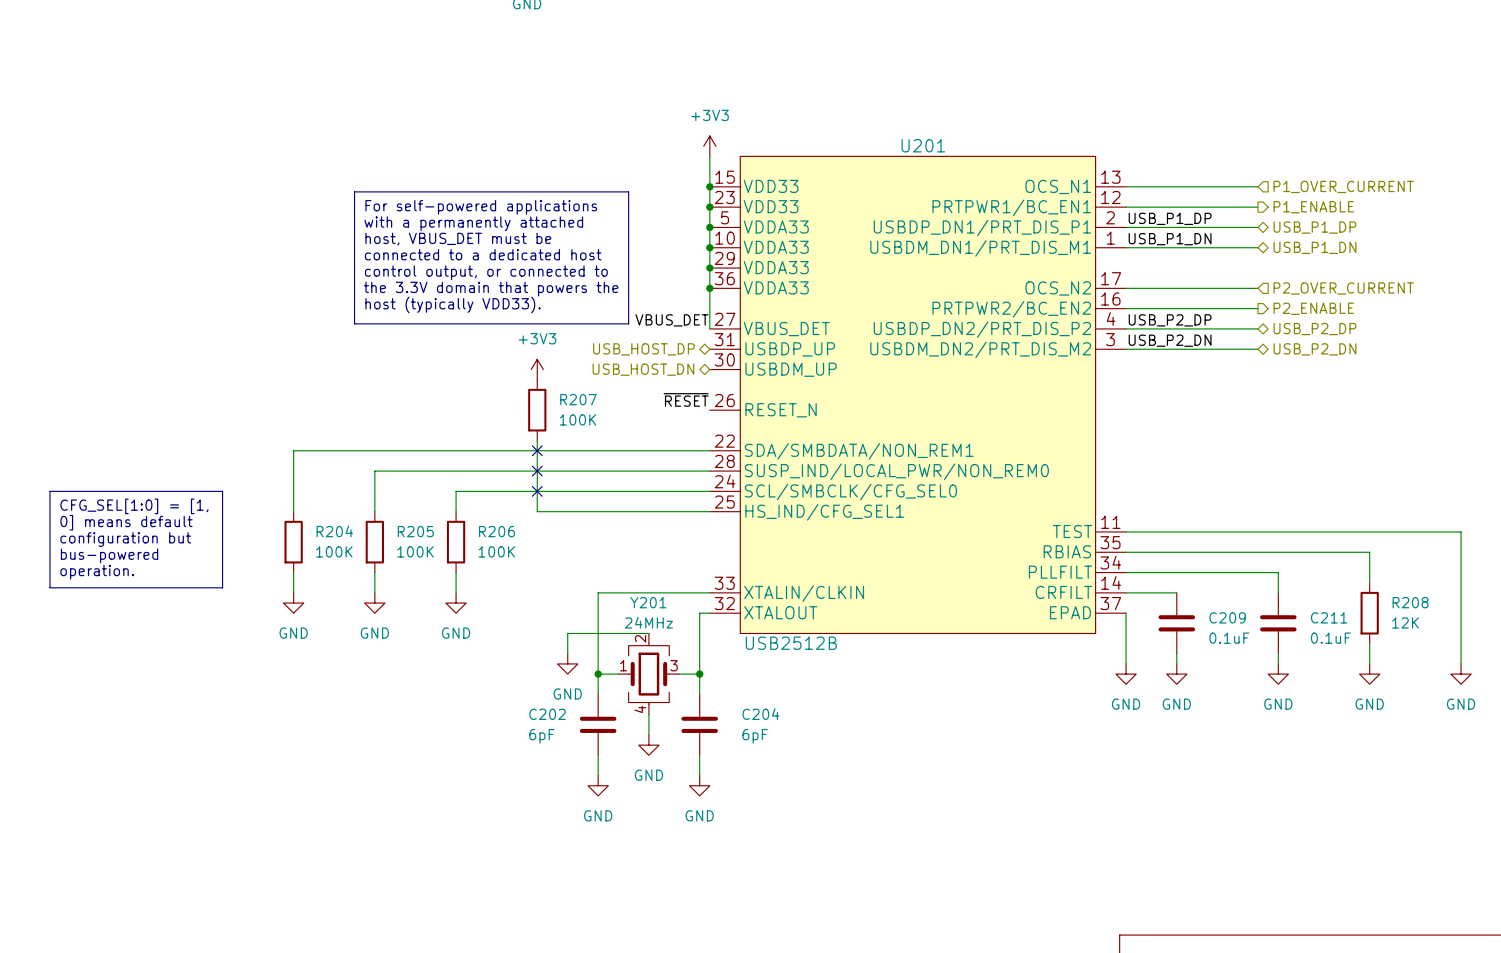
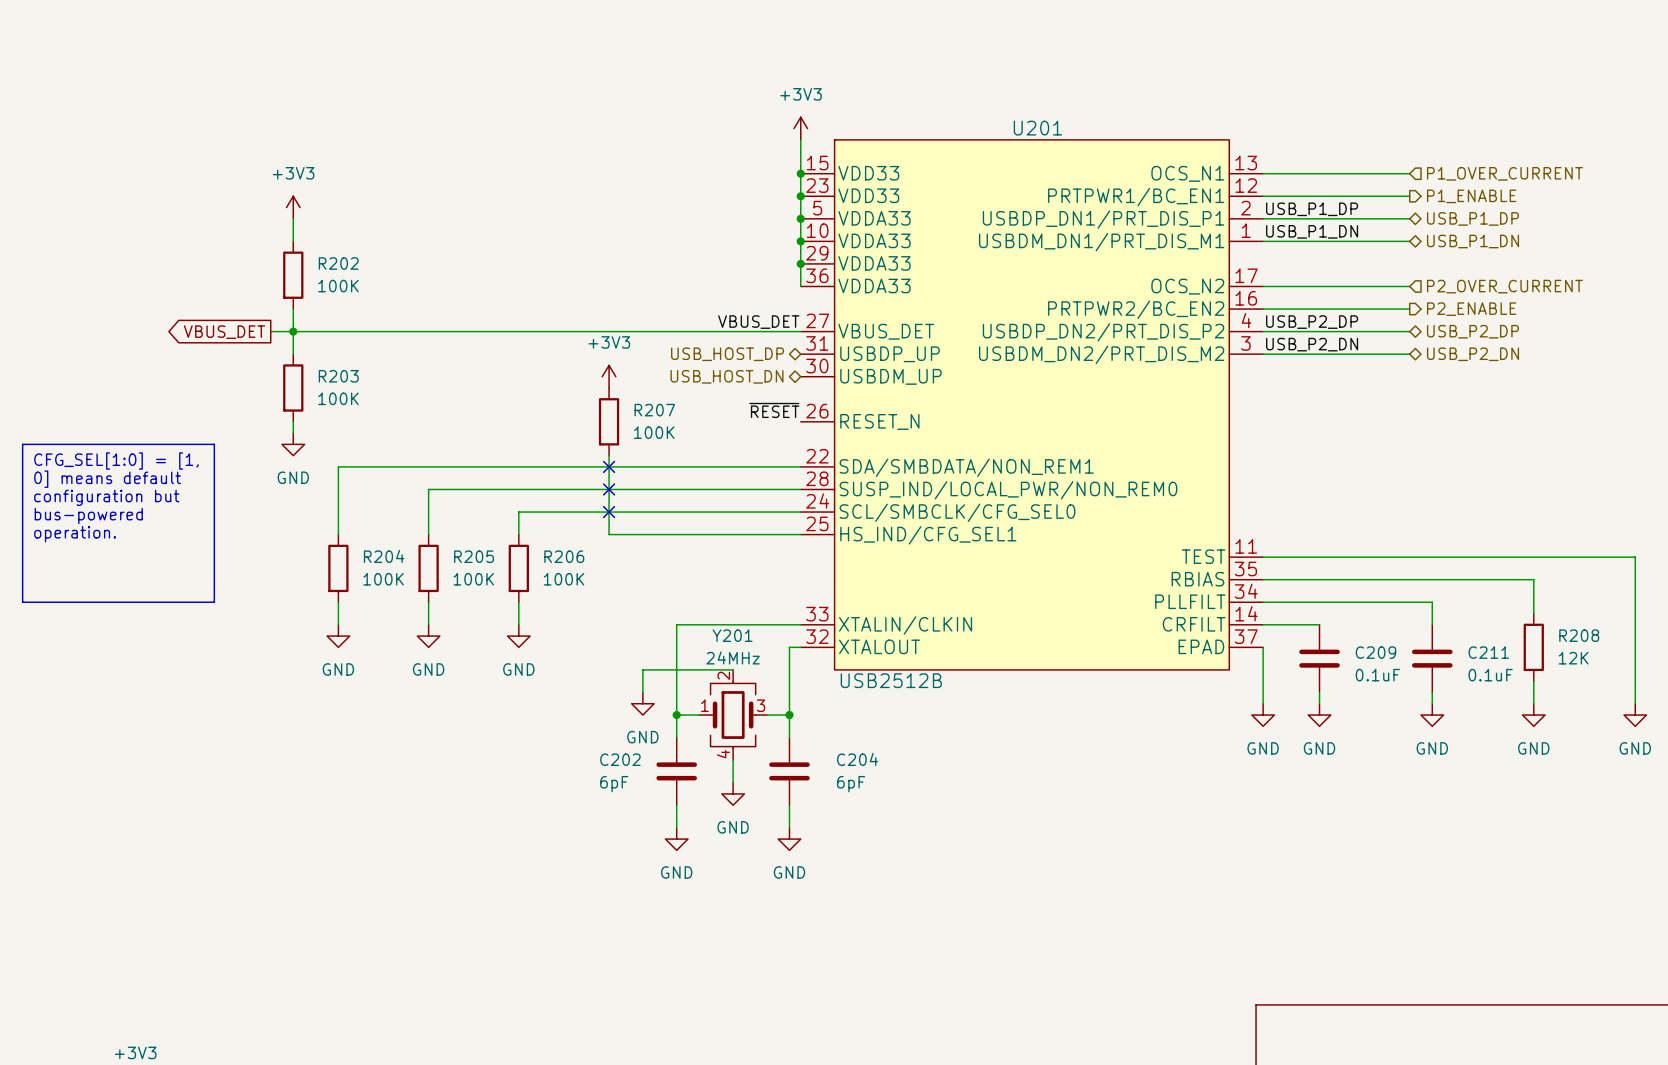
line: (354, 191) (628, 191) (628, 323) (354, 323) (354, 191) -> none
text: For self-powered applications (481, 207) -> none
power symbol: none -> +3V3 (293, 207)
text: with a permanently attached (473, 223) -> none
wire: none -> (293, 218) (293, 241)
text: host, VBUS_DET must be (458, 239) -> none
text: connected to a dedicated host (483, 254) -> none
text: control output, or connected to (486, 272) -> none
R202: none -> 100K (293, 275)
wire: (709, 288) (709, 328) -> (270, 331) (800, 331)
junction: (709, 288) -> none
text: the 3.3V domain that powers the (491, 289) -> none
text: host (typically VDD33). (453, 304) -> none
wire: none -> (293, 309) (293, 354)
junction: none -> (293, 331)
global label: none -> VBUS_DET (224, 332)
R203: none -> 100K (293, 387)
wire: none -> (293, 421) (293, 433)
line: none -> (22, 444) (214, 444) (214, 602) (22, 602) (22, 444)
power symbol: none -> GND (293, 444)
line: (50, 491) (222, 491) (222, 587) (50, 587) (50, 491) -> none
text position: CFG_SEL[1:0] = [1, (134, 506) -> CFG_SEL[1:0] = [1, (116, 461)
text position: 0] means default (126, 522) -> 0] means default (107, 479)
text position: configuration but (125, 539) -> configuration but (106, 497)
text position: bus-powered (109, 555) -> bus-powered (88, 516)
text position: operation. (97, 572) -> operation. (75, 534)

